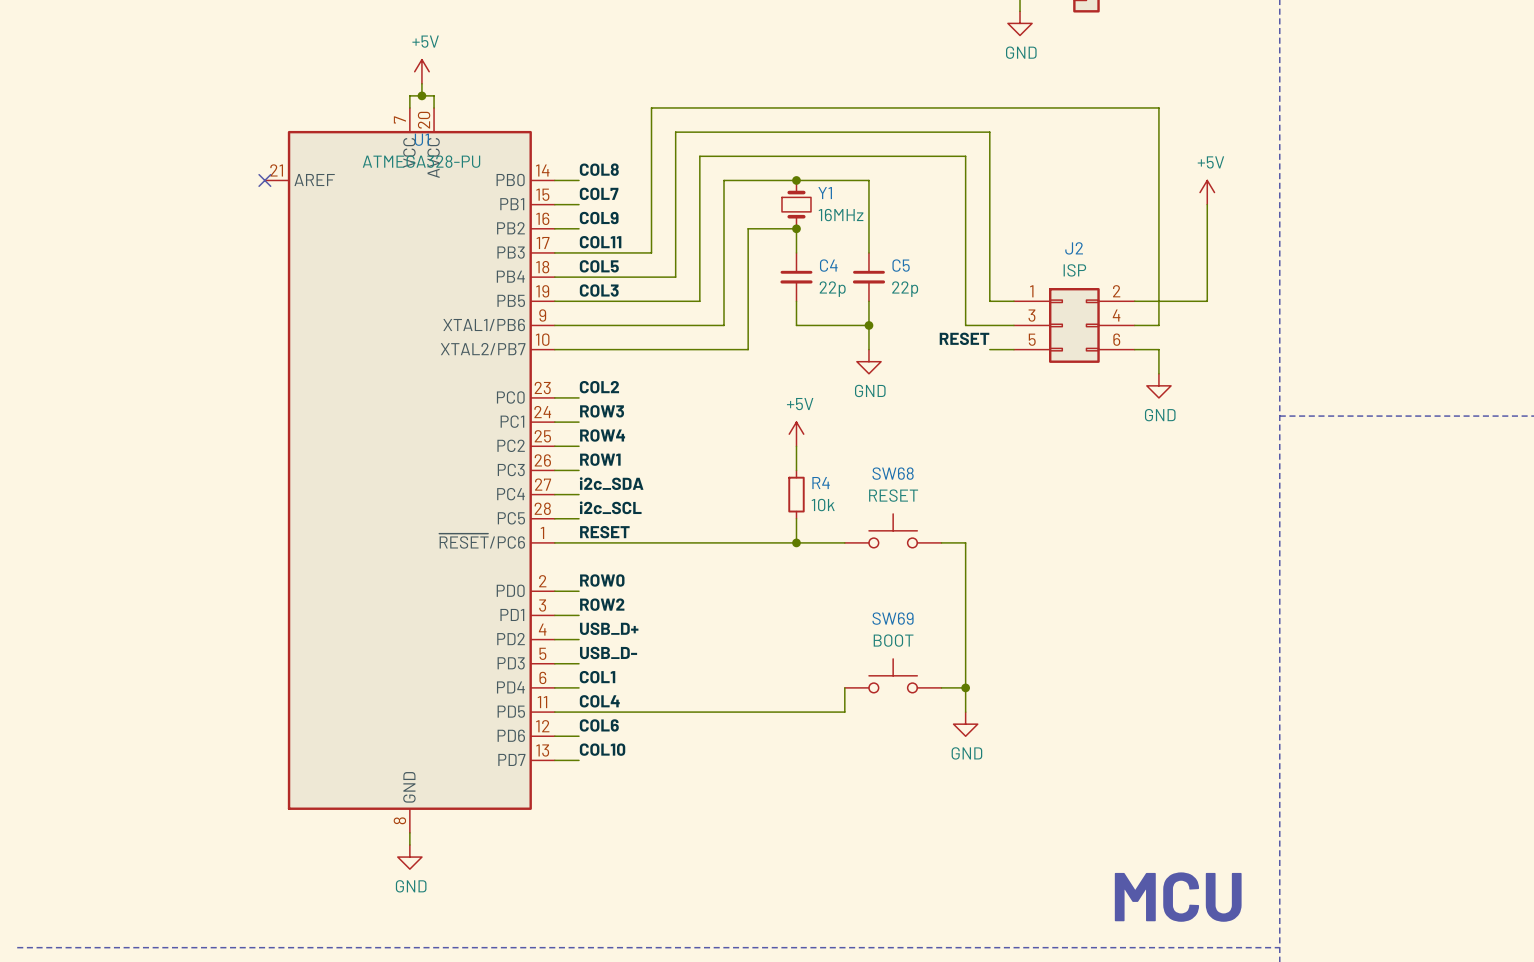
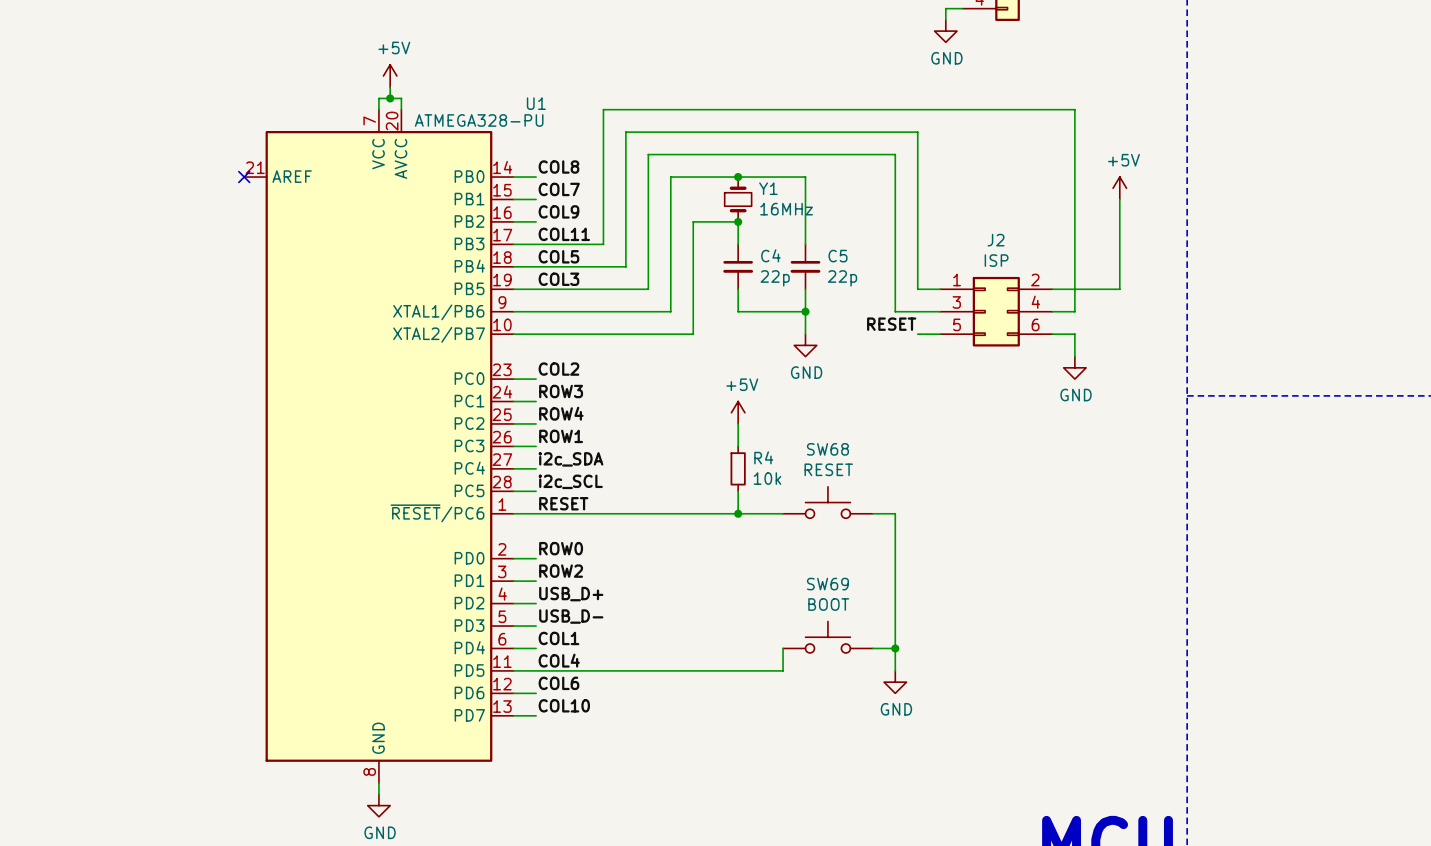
U1 name position: U1 (421, 139) -> U1 (536, 103)
U1 value position: ATMEGA328-PU (421, 161) -> ATMEGA328-PU (479, 120)

